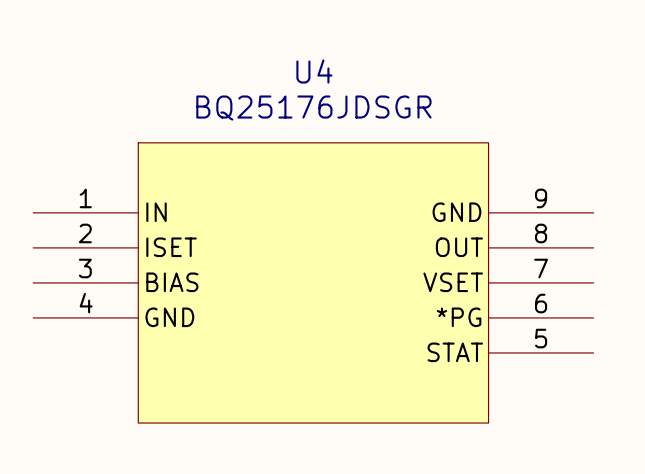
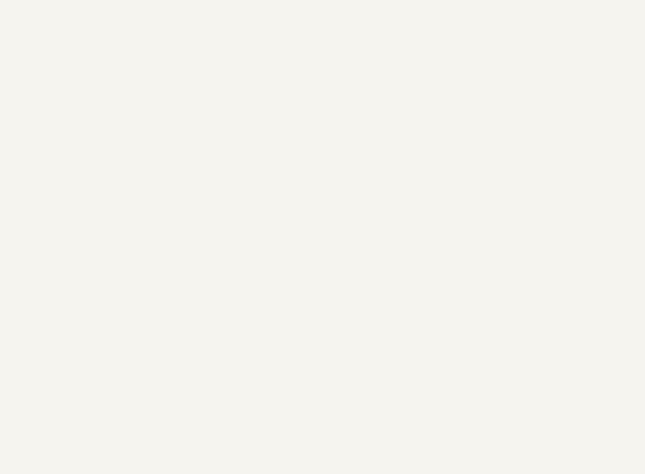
U4: BQ25176JDSGR (313, 282) -> none

